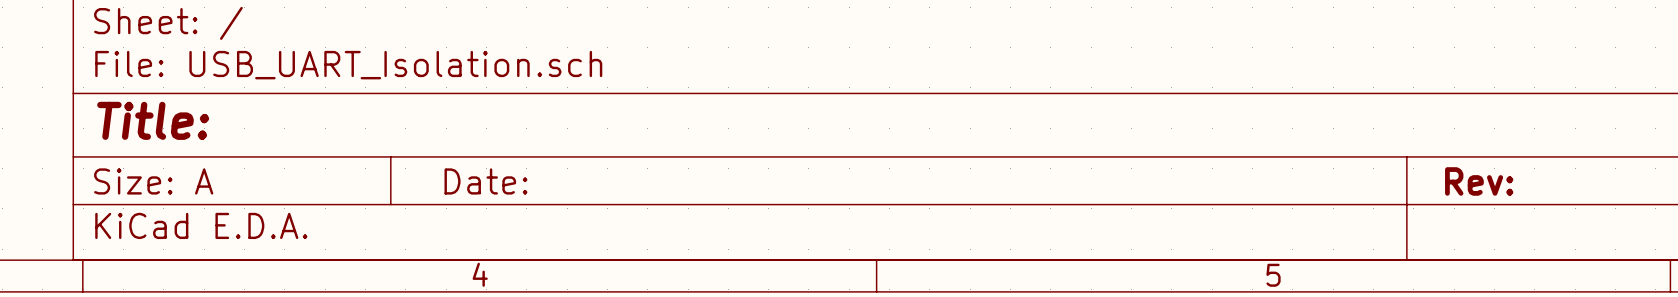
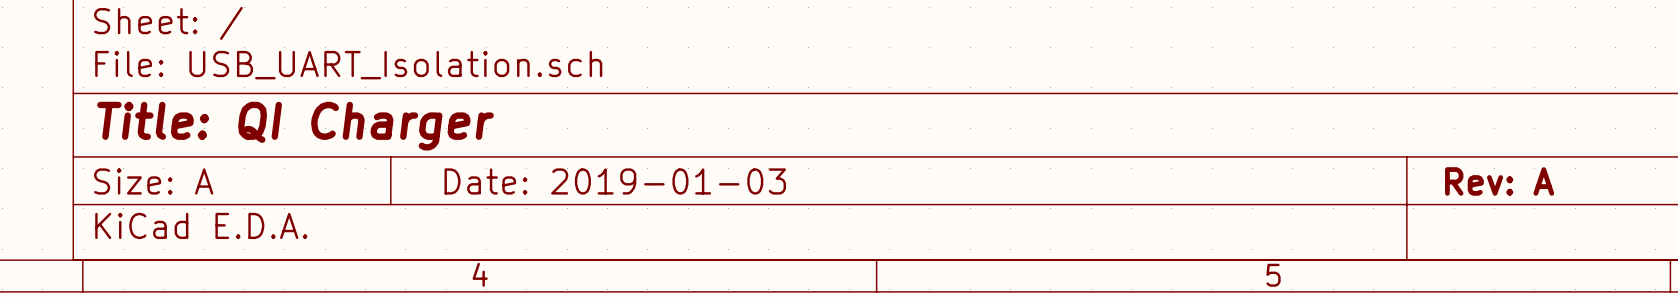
title block: Title: (153, 120) -> Title: QI Charger (295, 126)
title block: Date: (485, 181) -> Date: 2019-01-03 (615, 181)
title block: Rev: (1479, 181) -> Rev: A (1499, 181)

